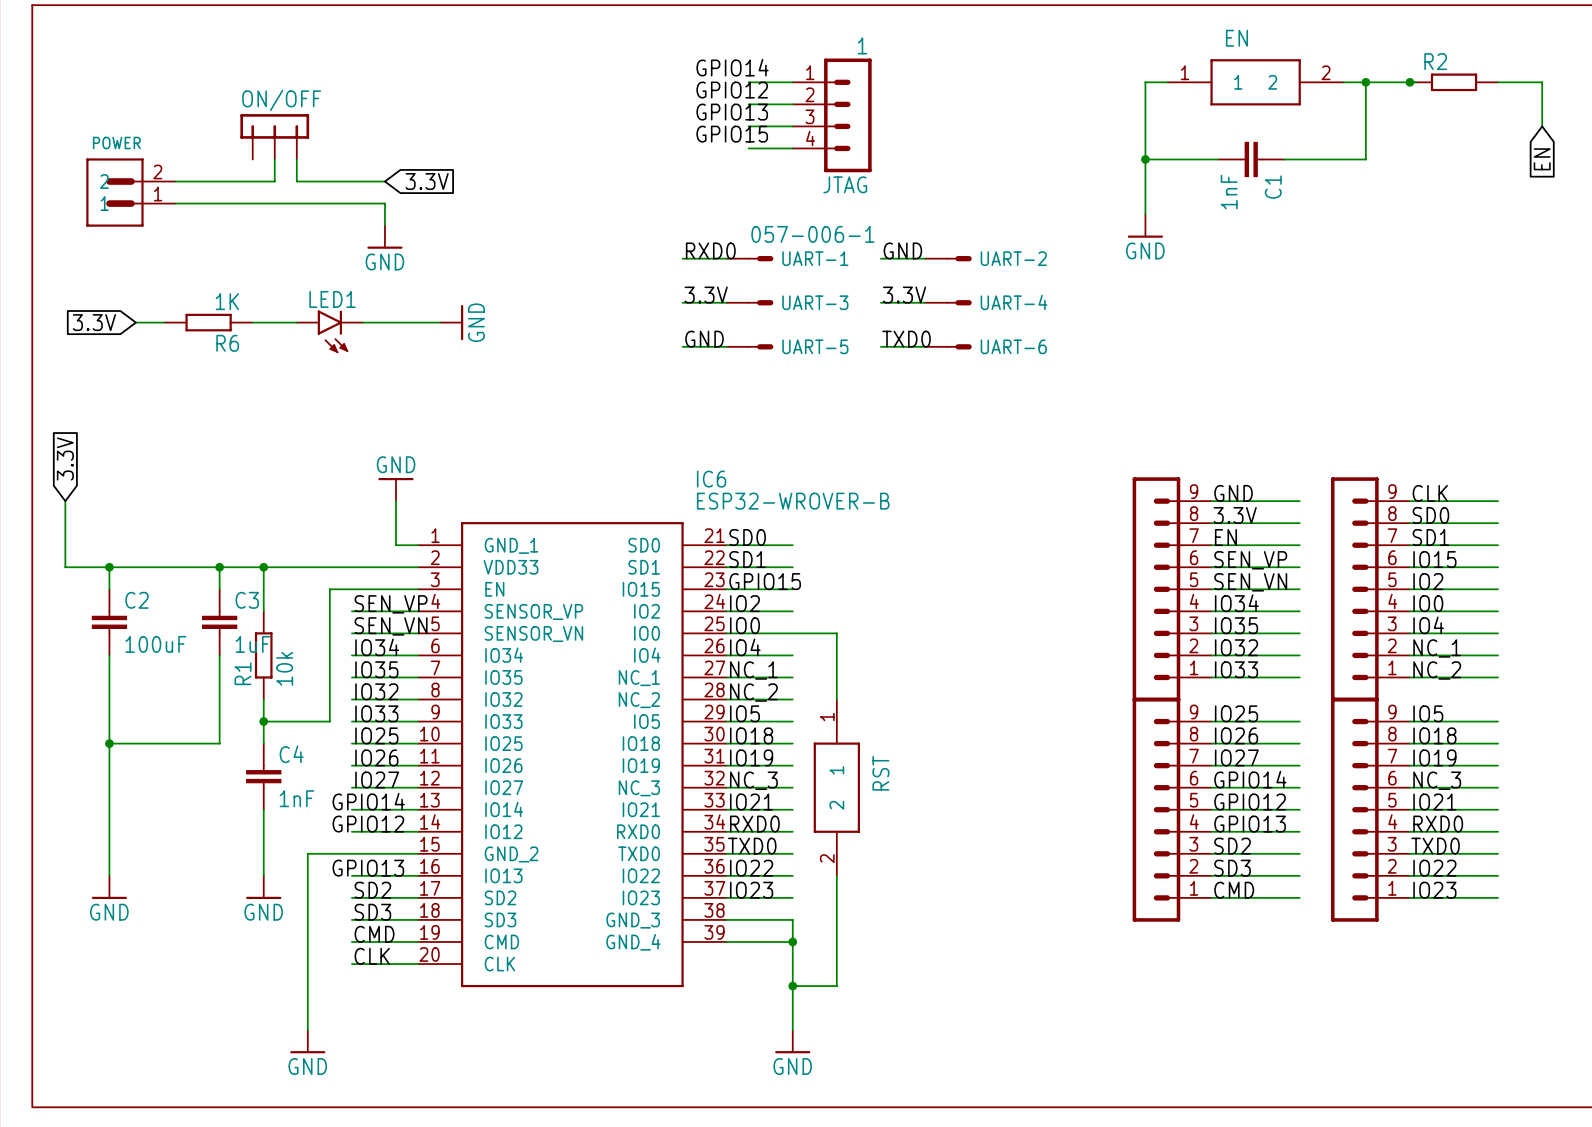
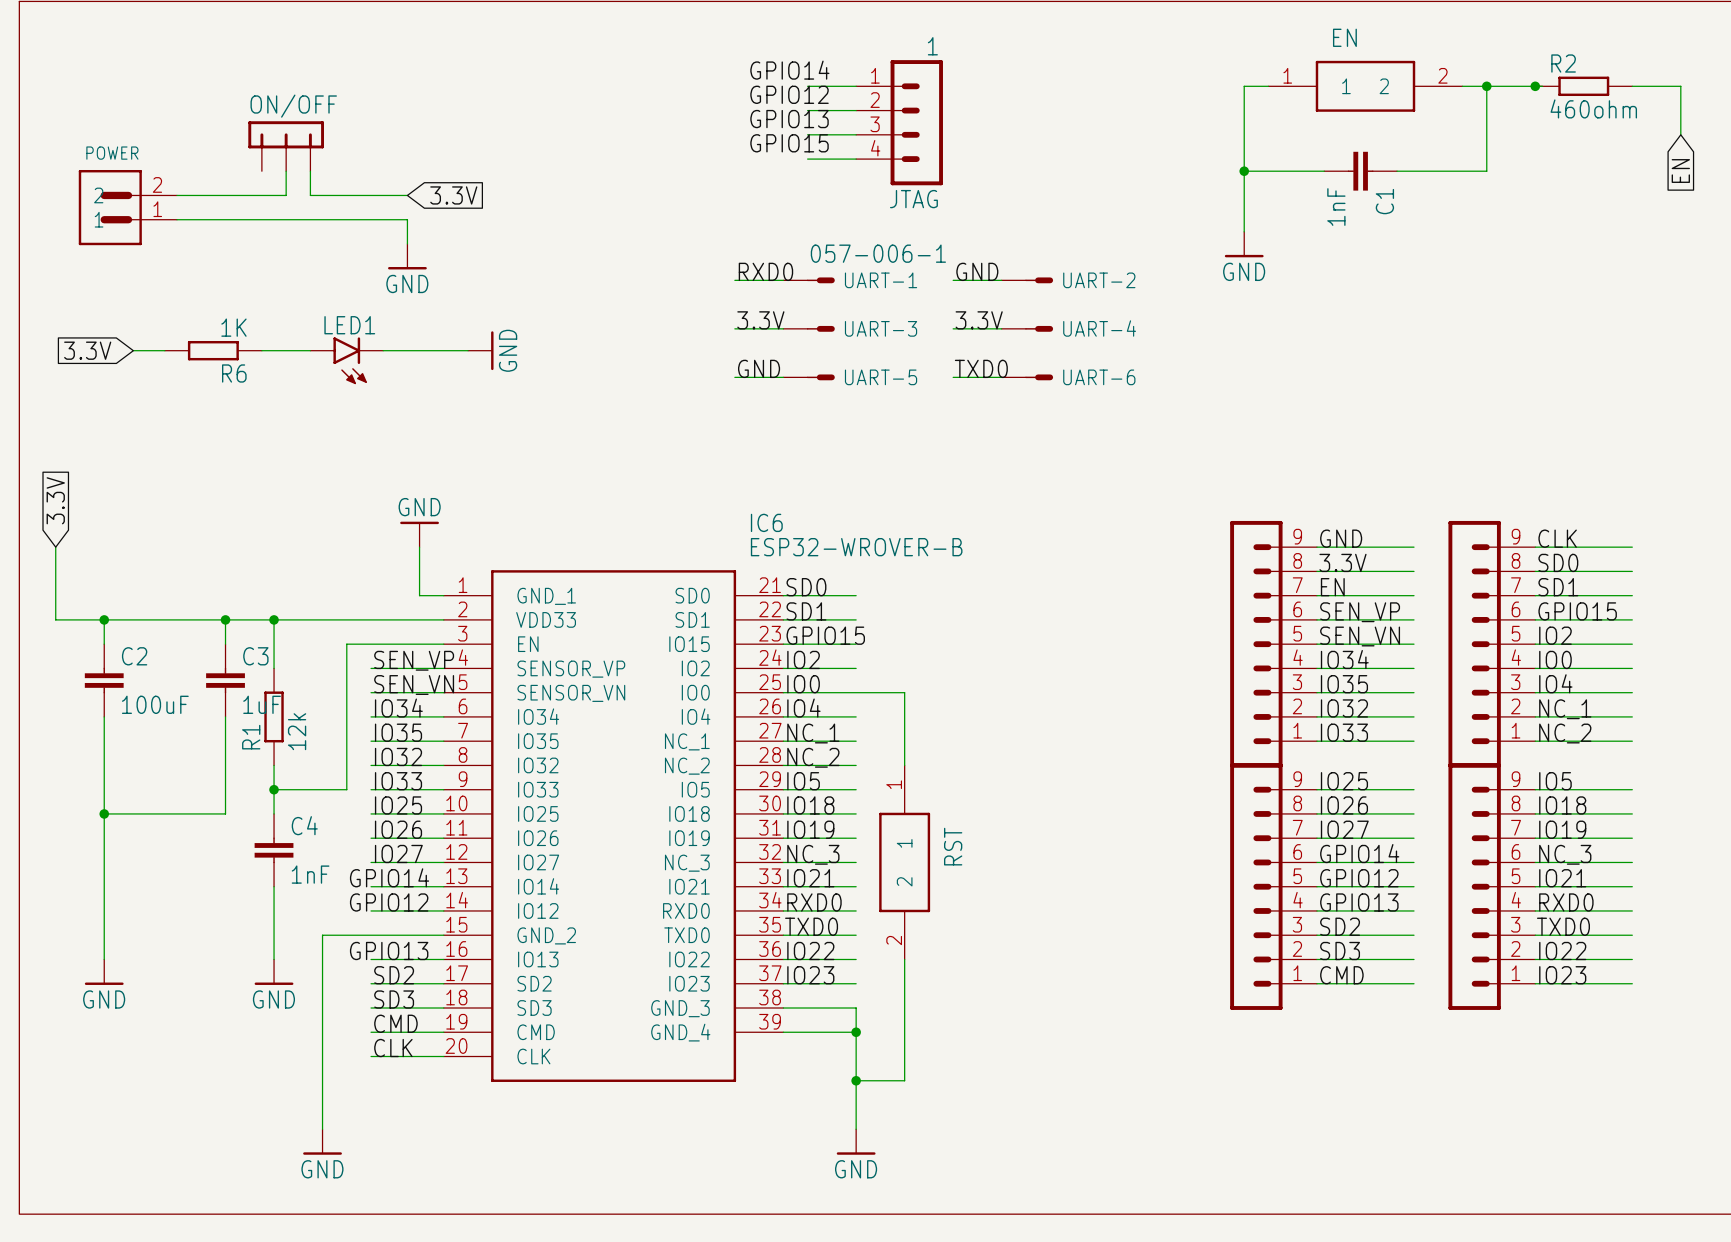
R2 value: none -> 460ohm (1593, 108)
label: IO15 (1434, 559) -> GPIO15 (1577, 611)
R1 value: 10k (284, 668) -> 12k (297, 731)

